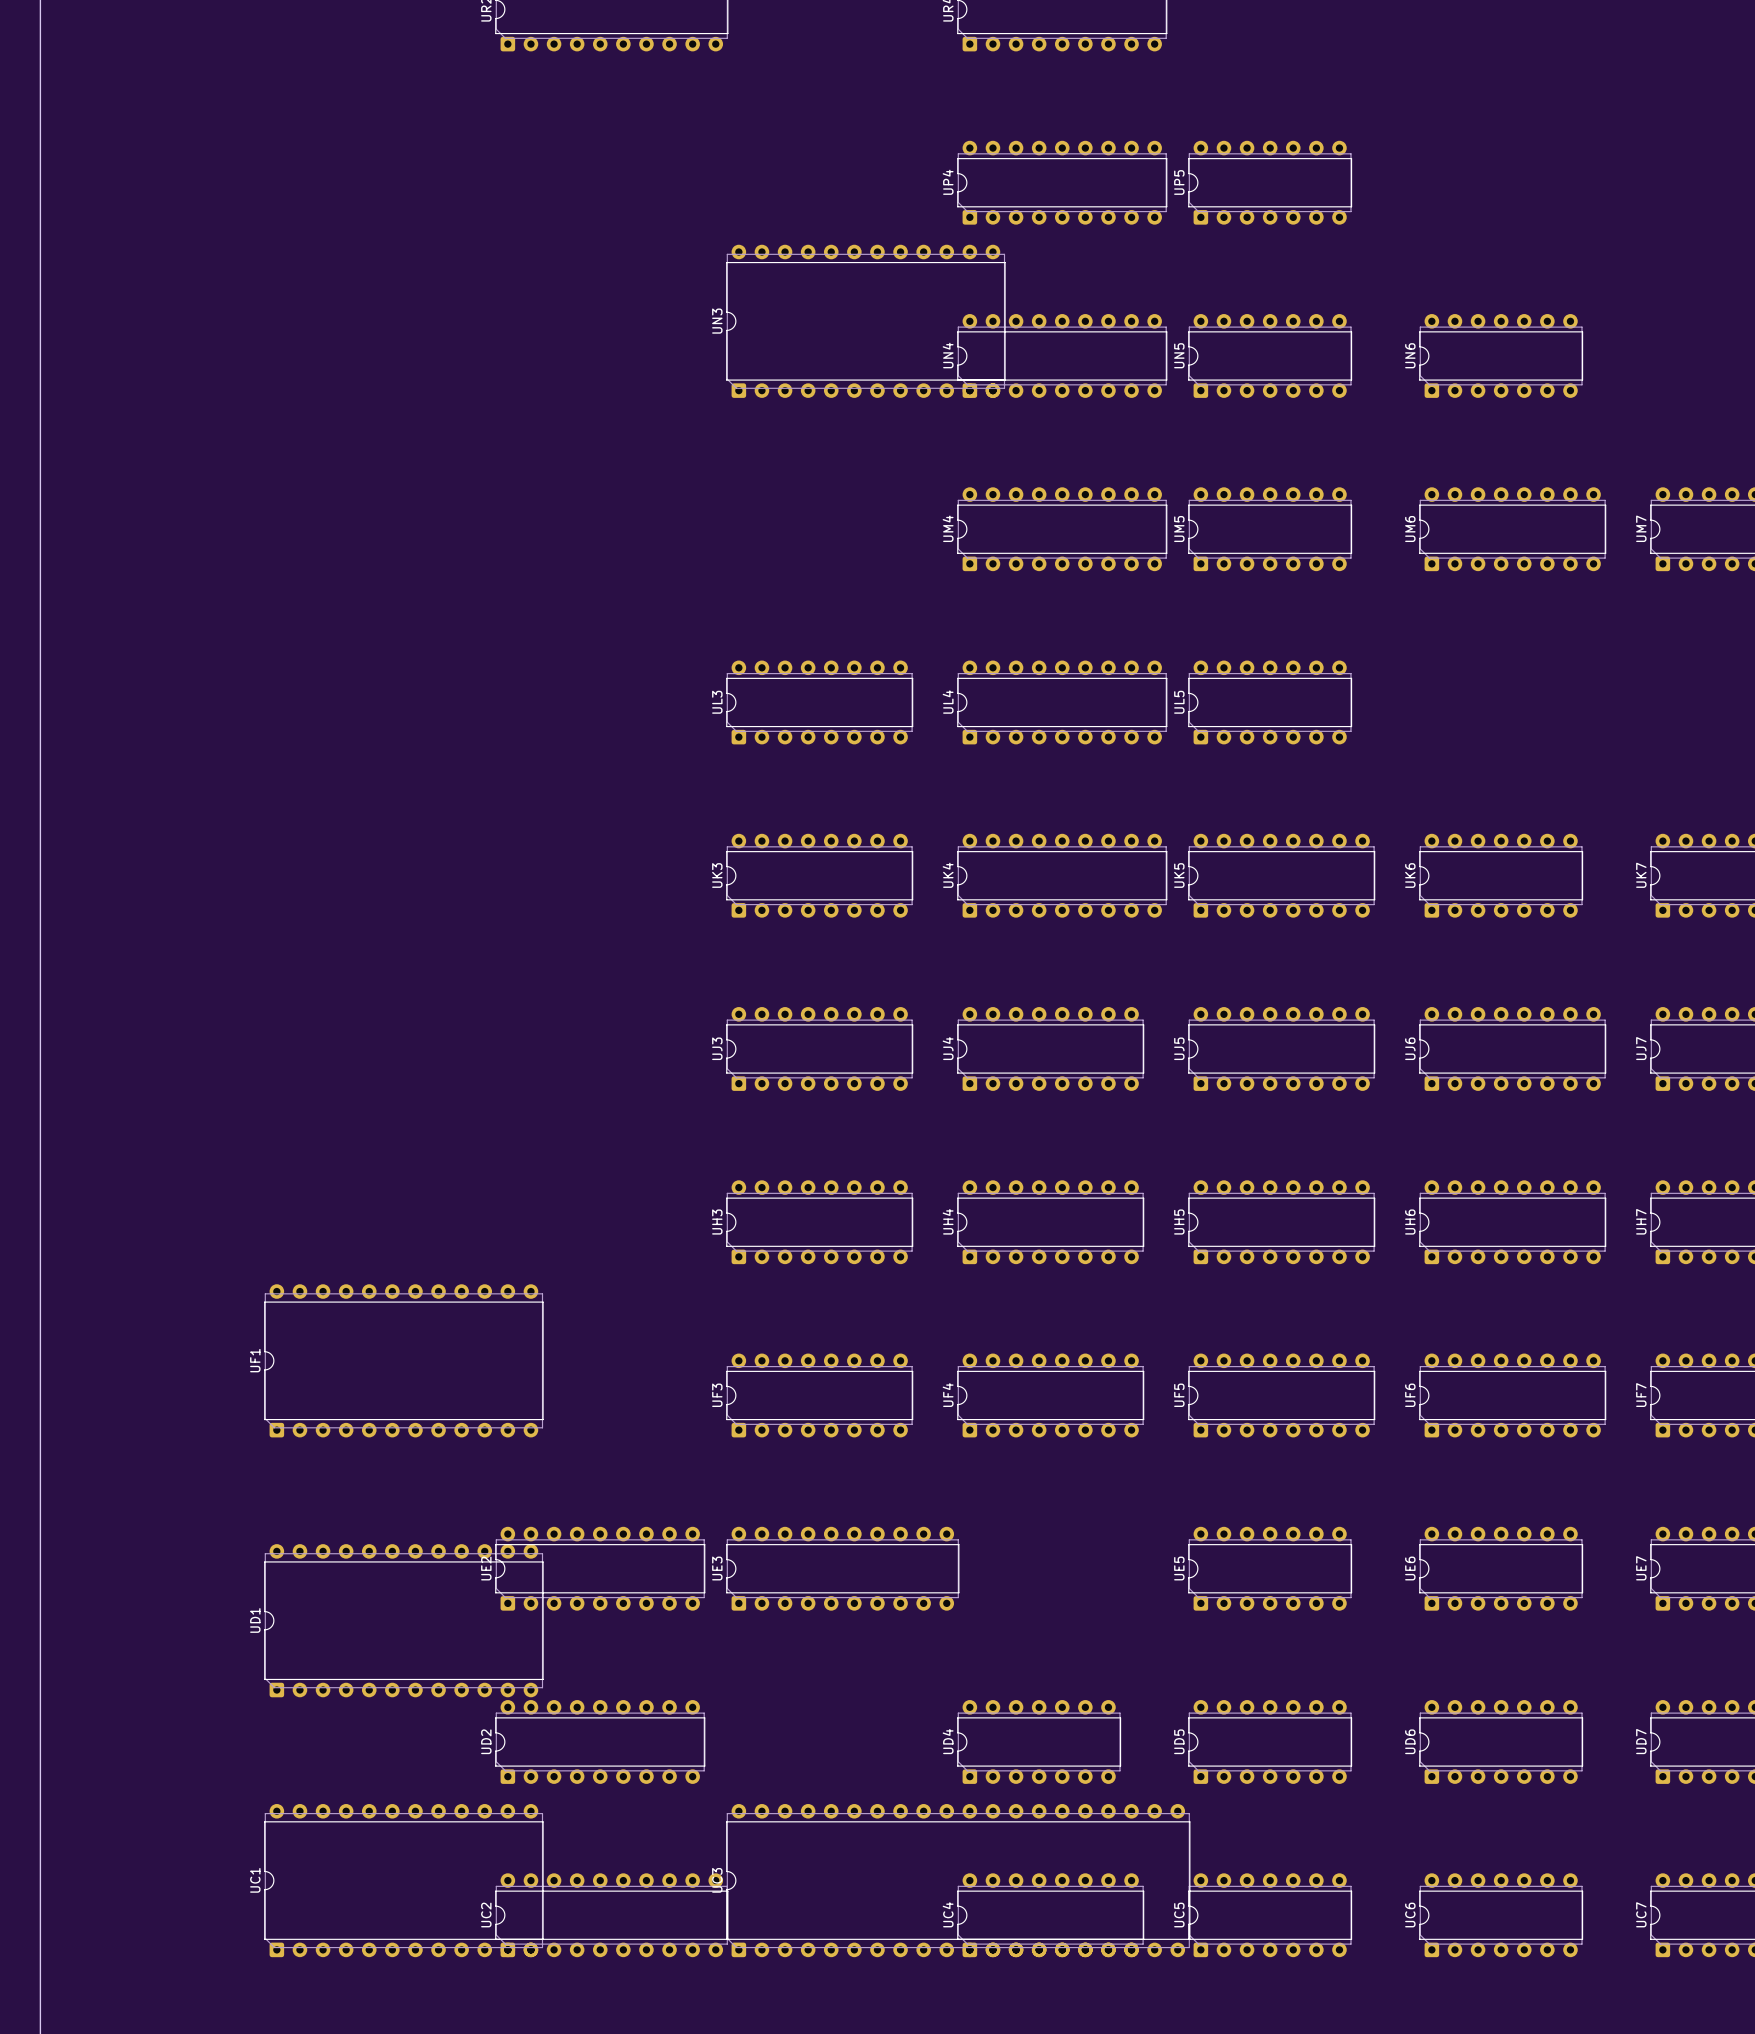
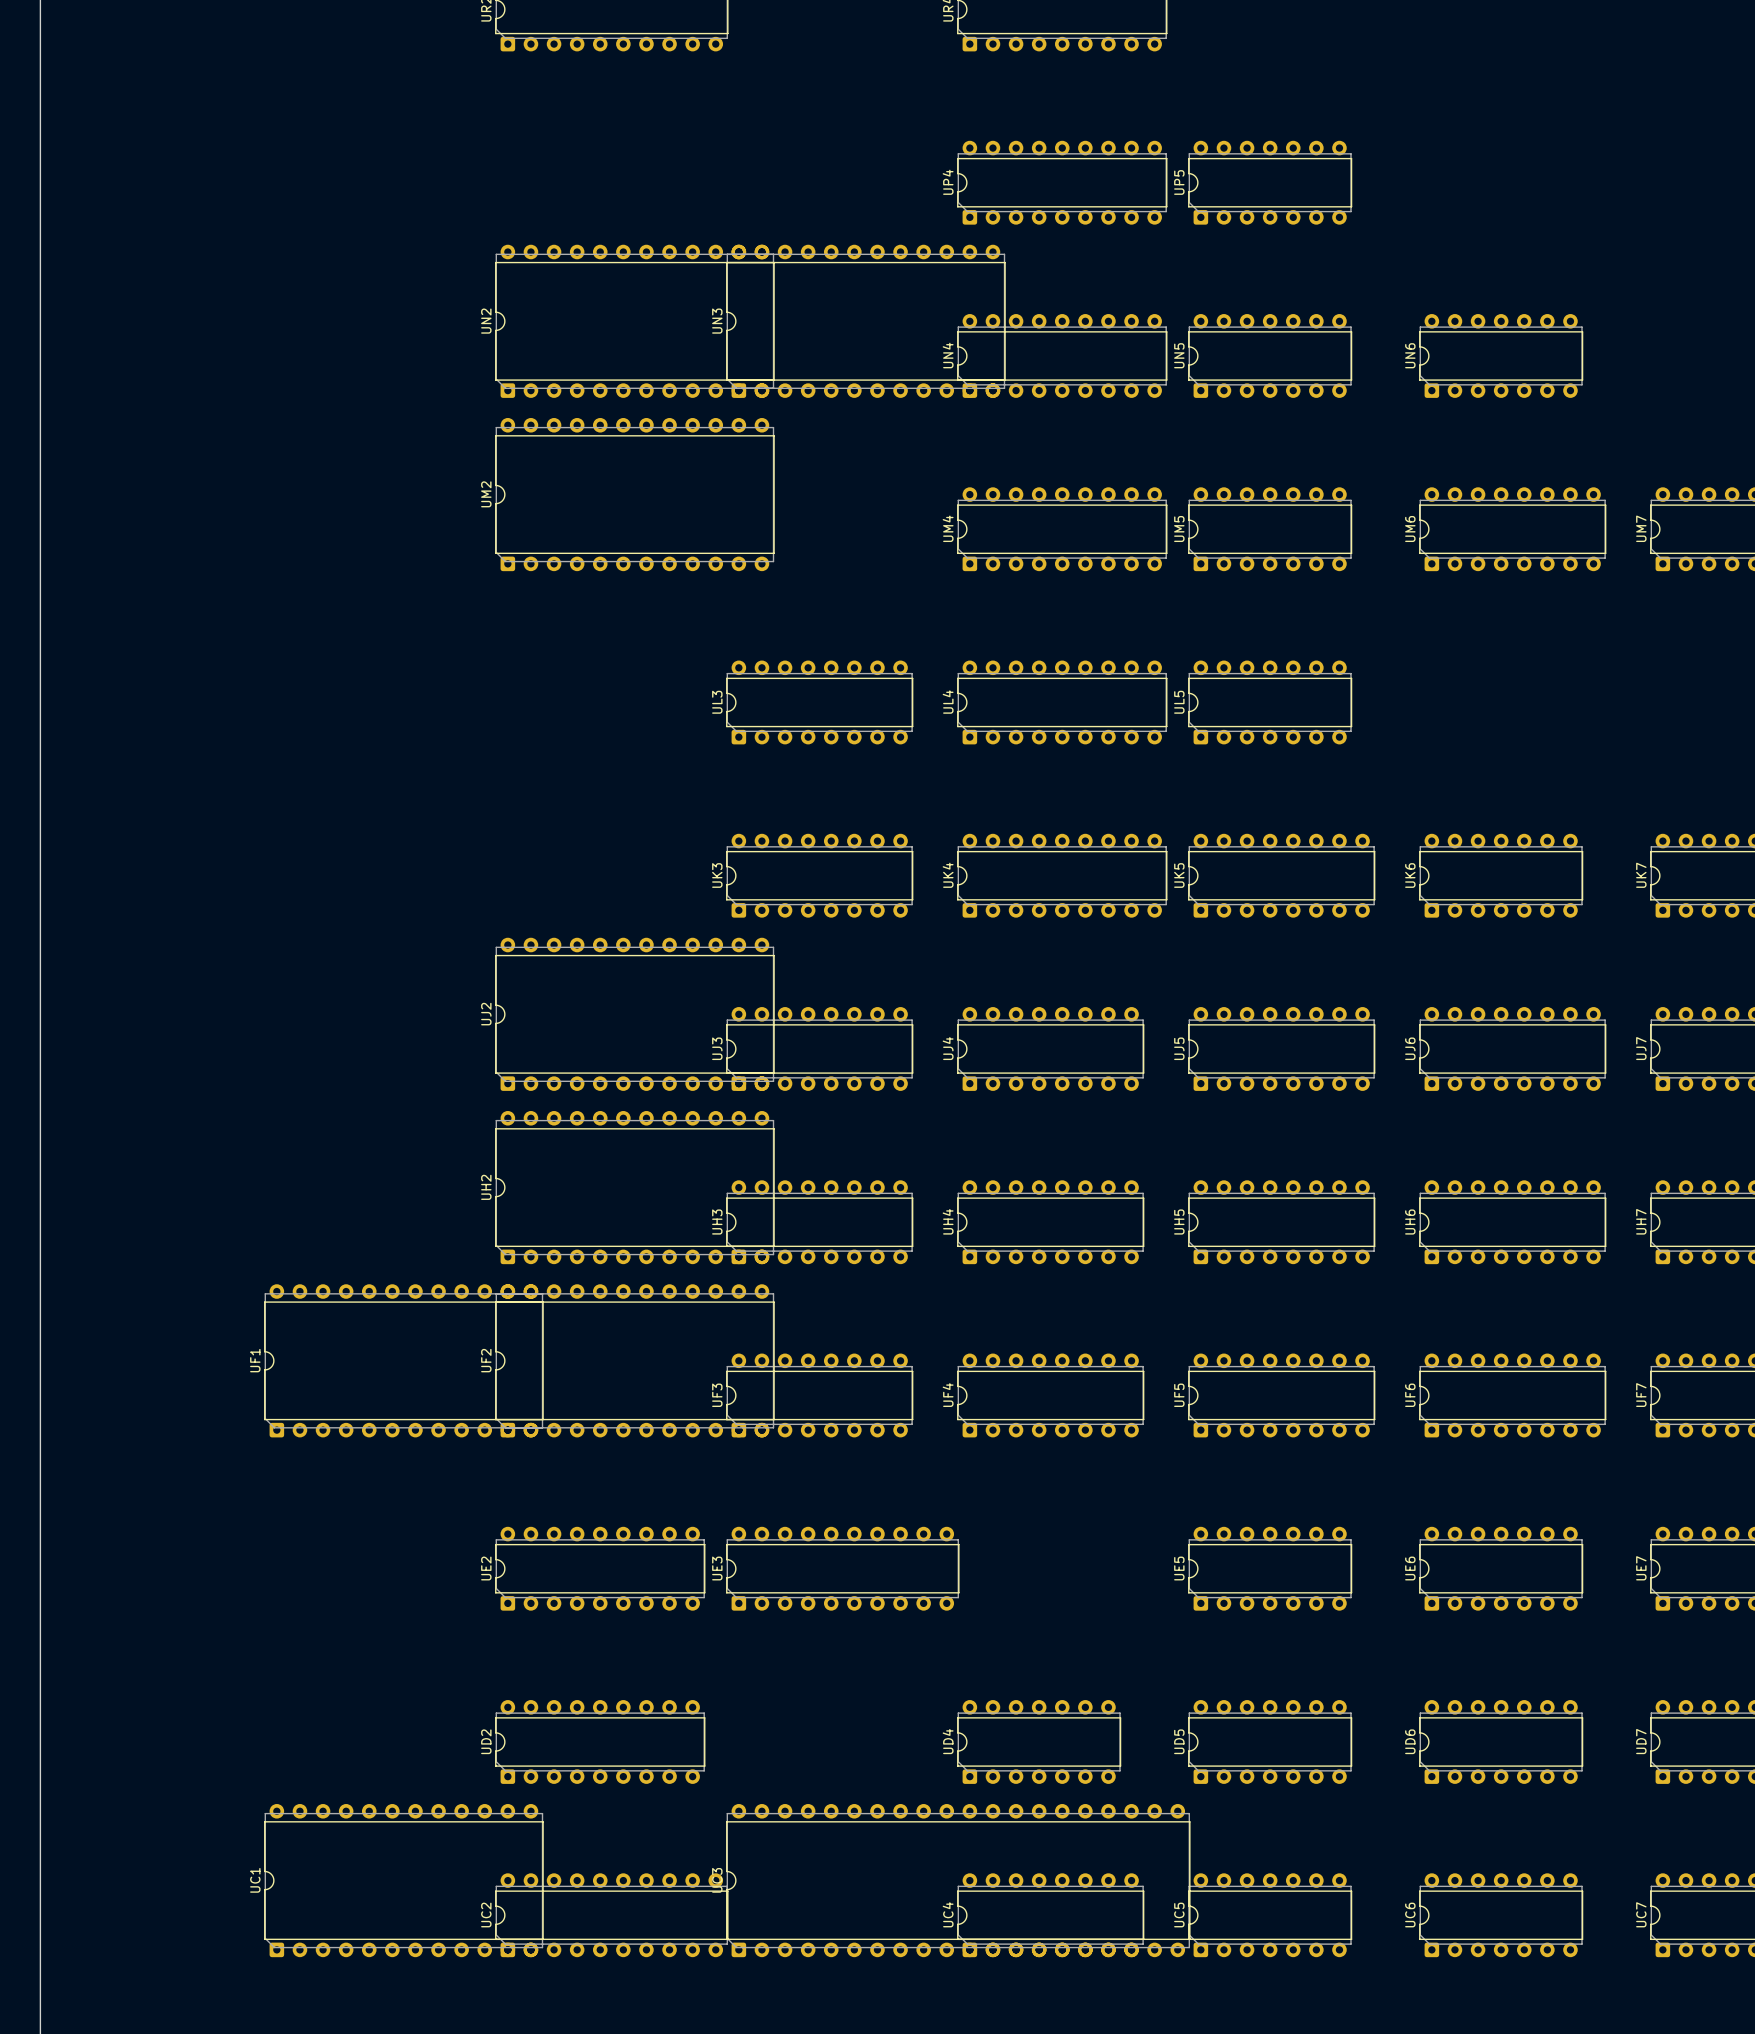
UN2: none -> (634, 321)
UM2: none -> (634, 494)
UJ2: none -> (634, 1014)
UH2: none -> (634, 1187)
UF2: none -> (634, 1360)
UD1: (403, 1620) -> none

